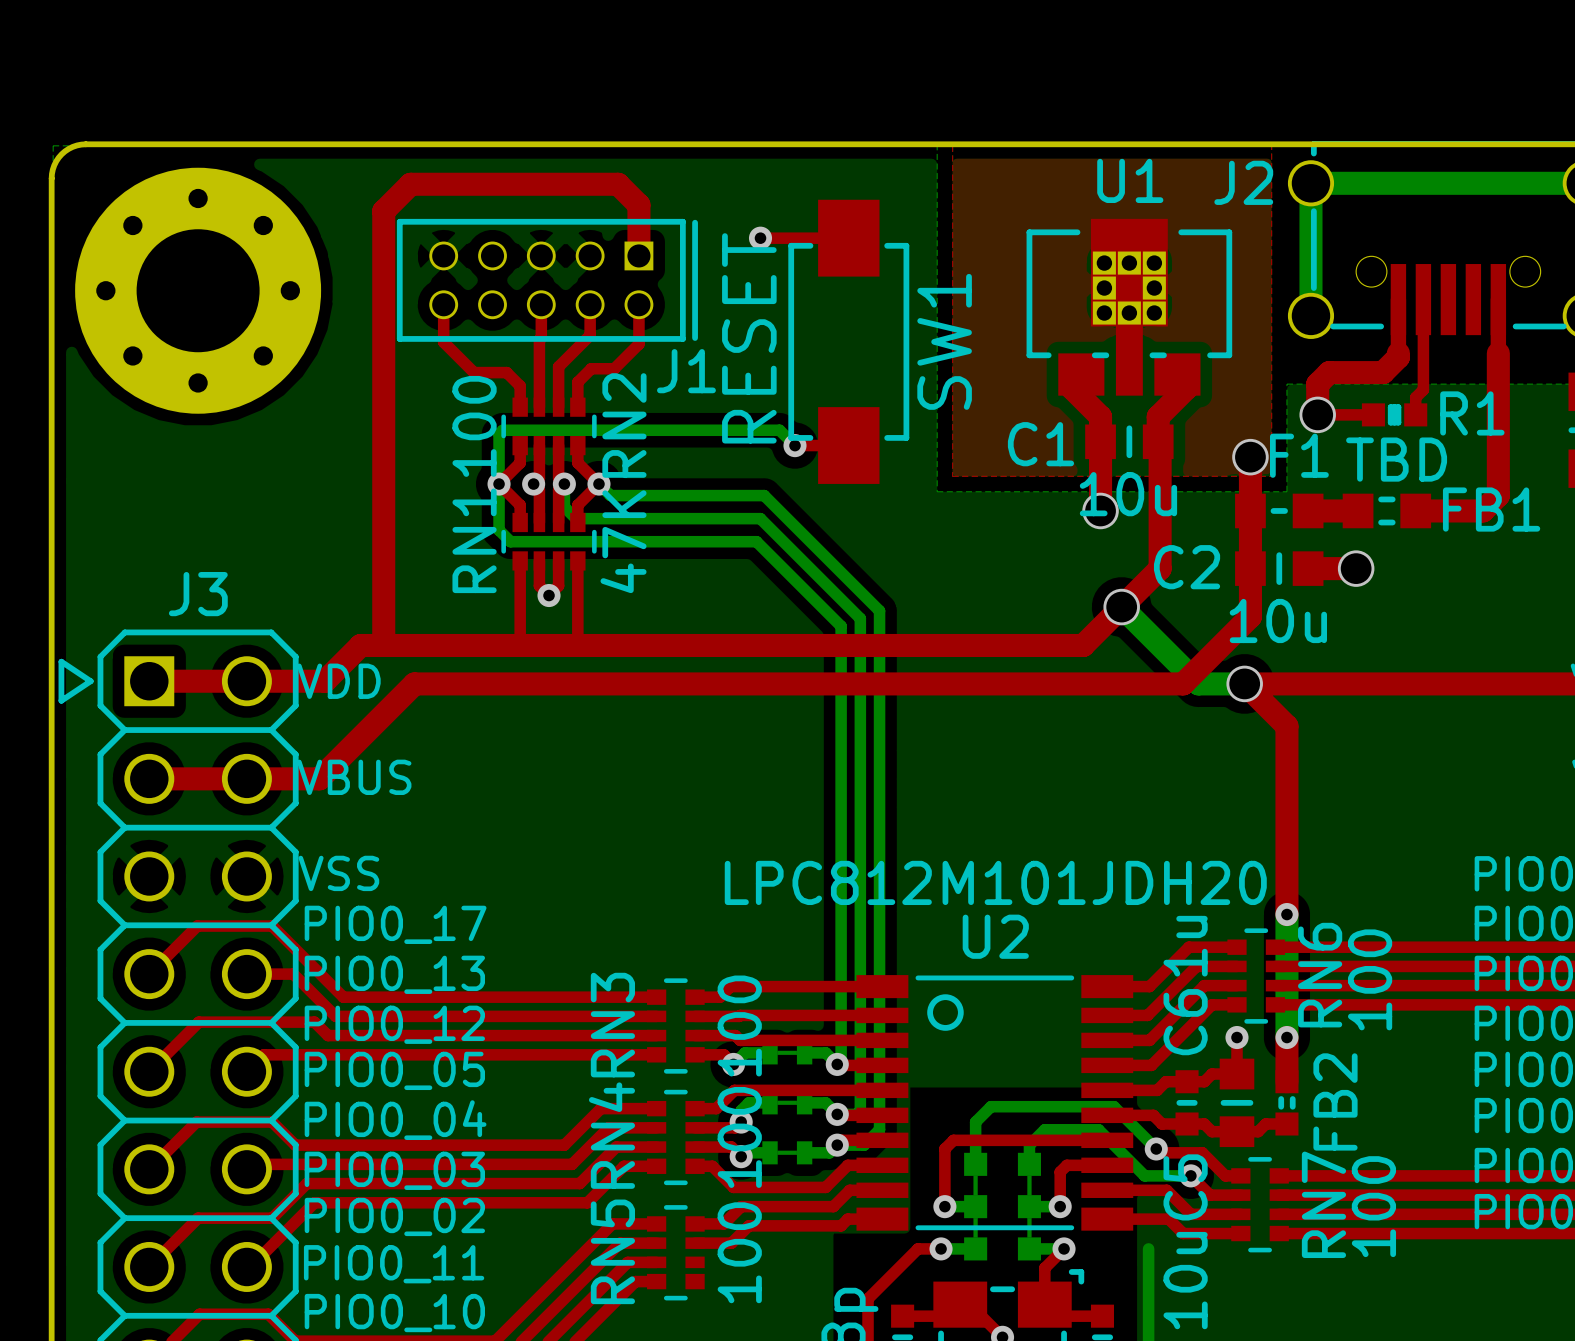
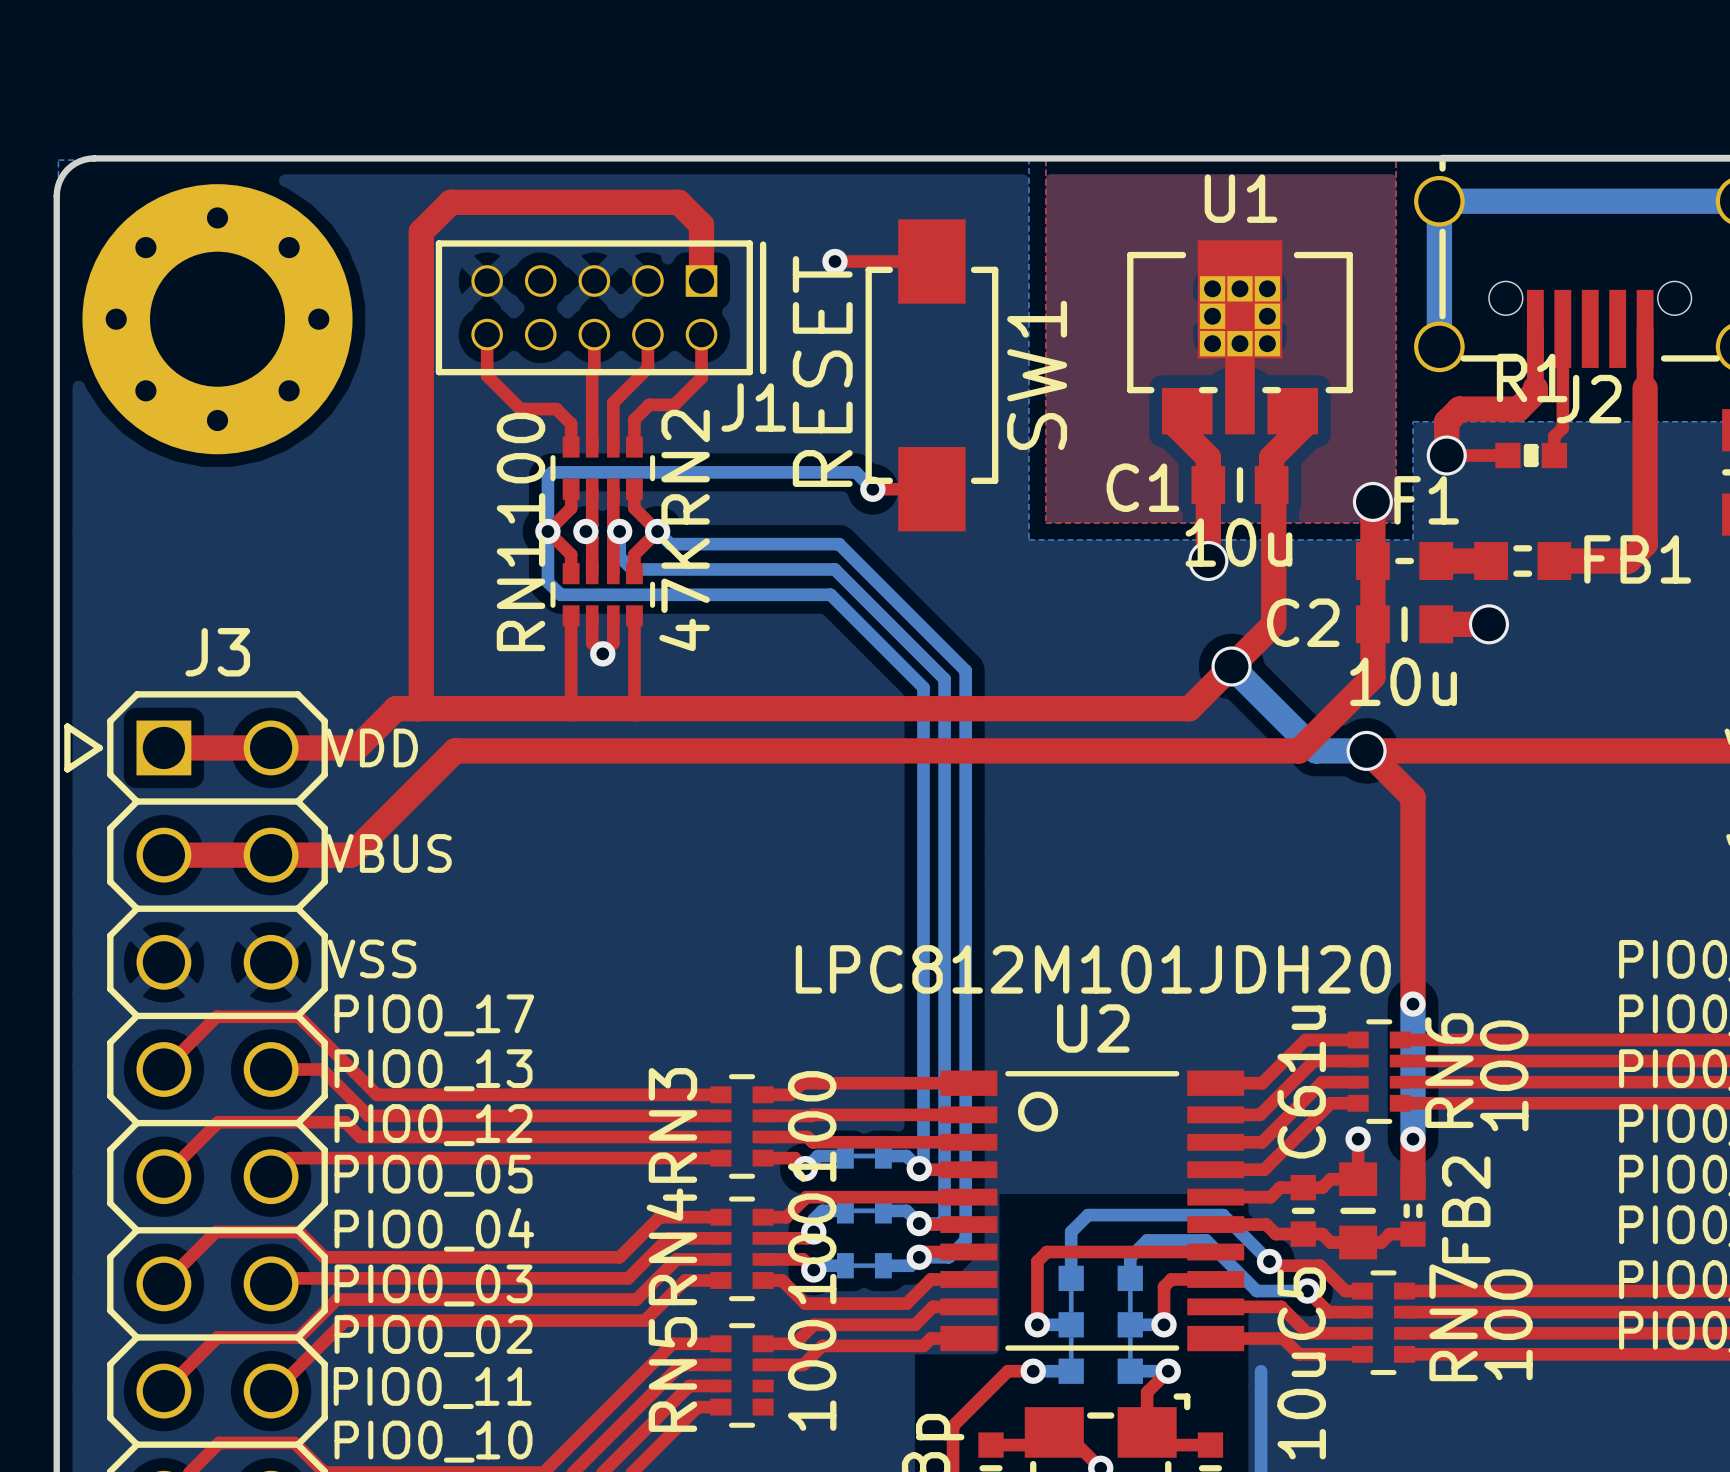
J2 name position: J2 (1243, 182) -> J2 (1589, 399)
R1 name position: R1 (1472, 413) -> R1 (1532, 377)
R1 value: TBD (1396, 459) -> none

